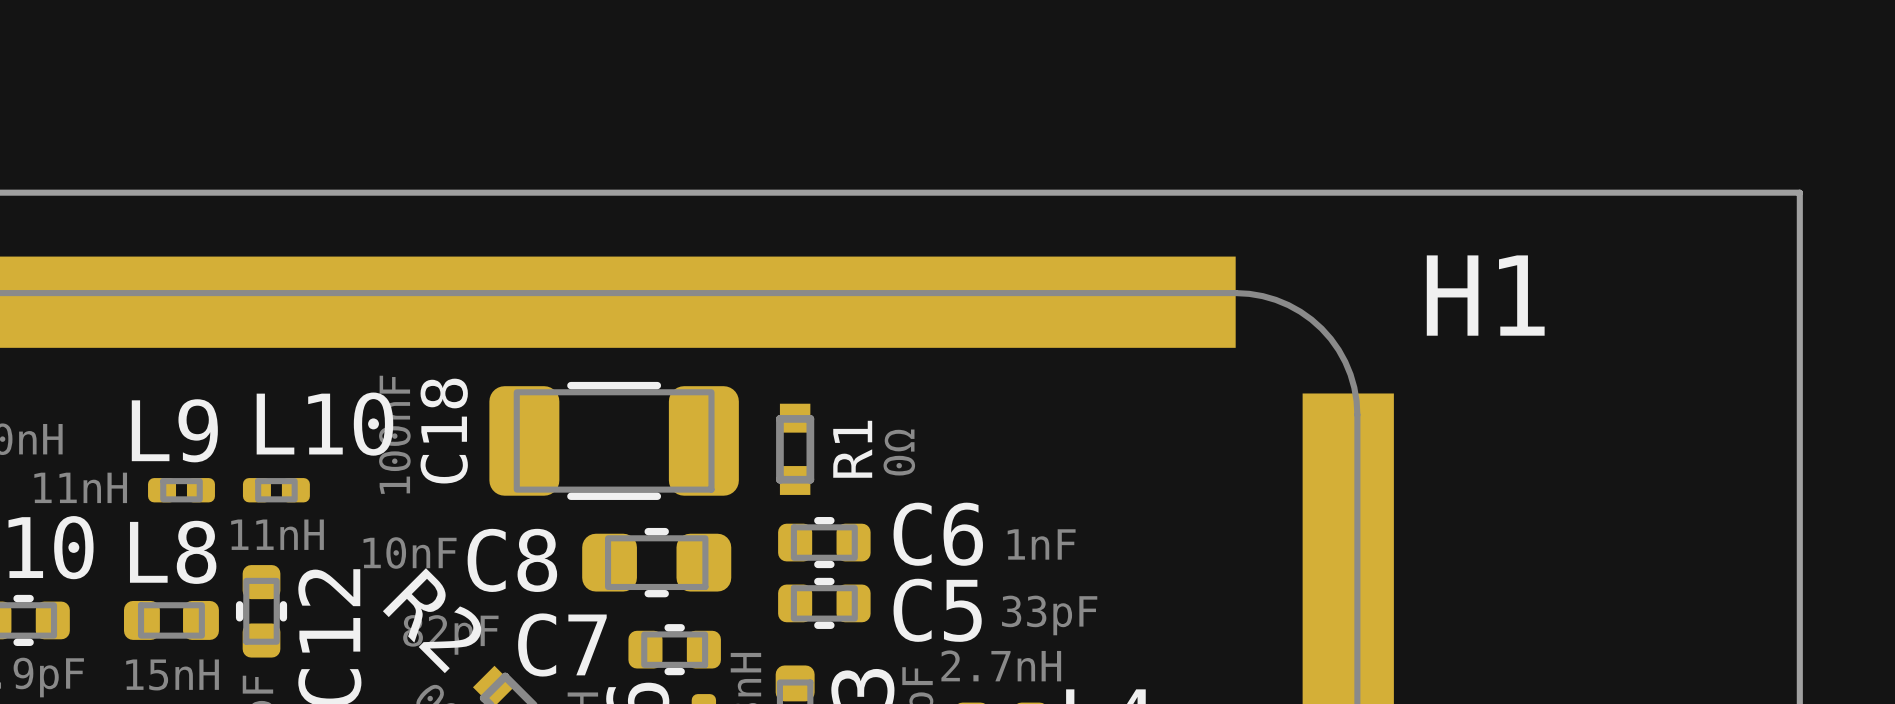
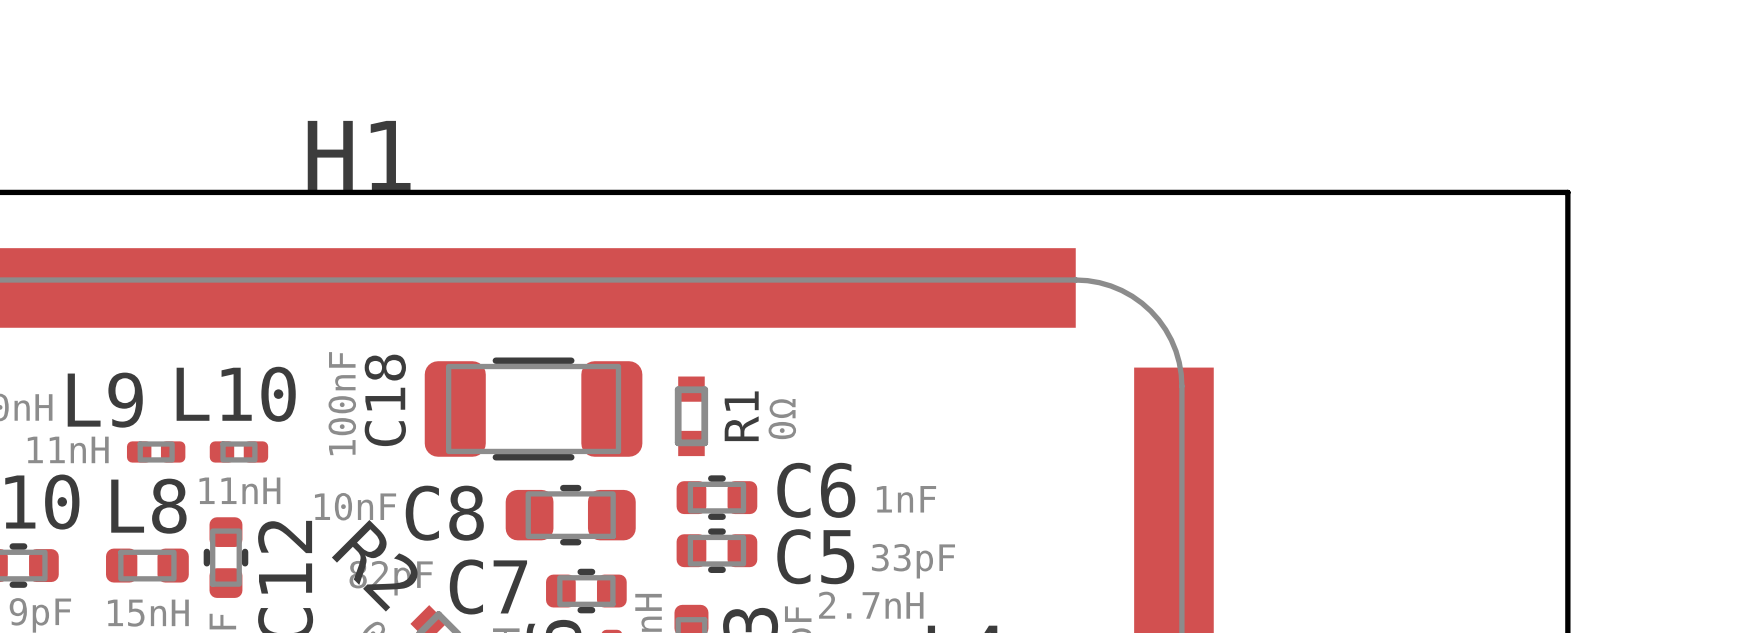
H1 name position: H1 (1485, 295) -> H1 (359, 155)
L10 name position: L10 (324, 424) -> L10 (236, 394)
L9 name position: L9 (174, 430) -> L9 (105, 400)

